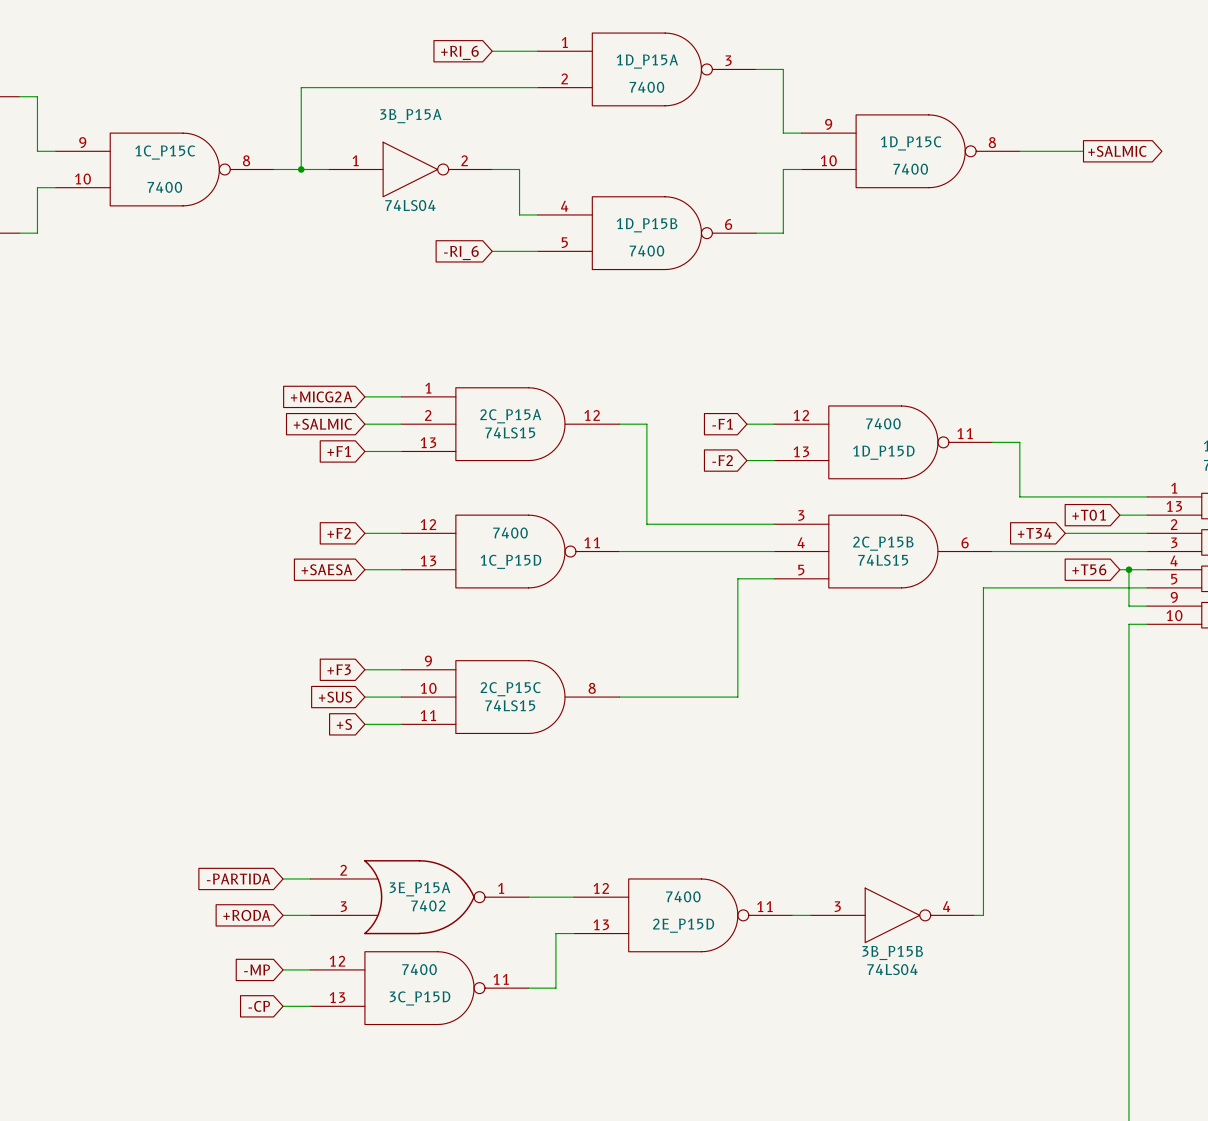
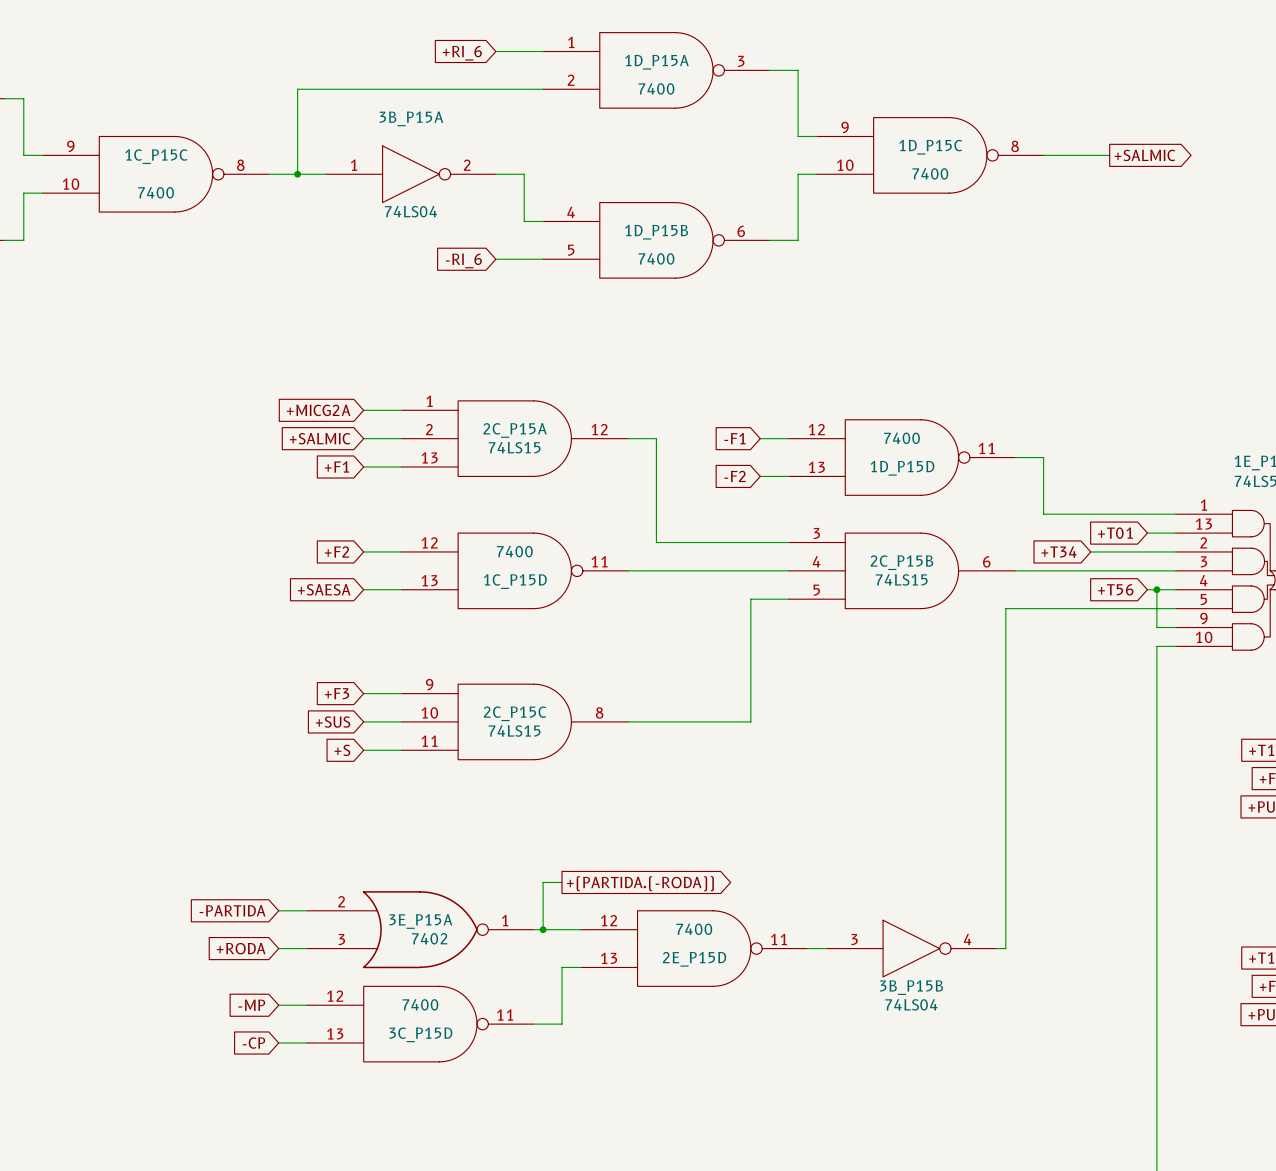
wire: none -> (562, 882) (543, 882) (543, 929)
global label: none -> +(PARTIDA.(-RODA)) (640, 883)
junction: none -> (543, 929)

